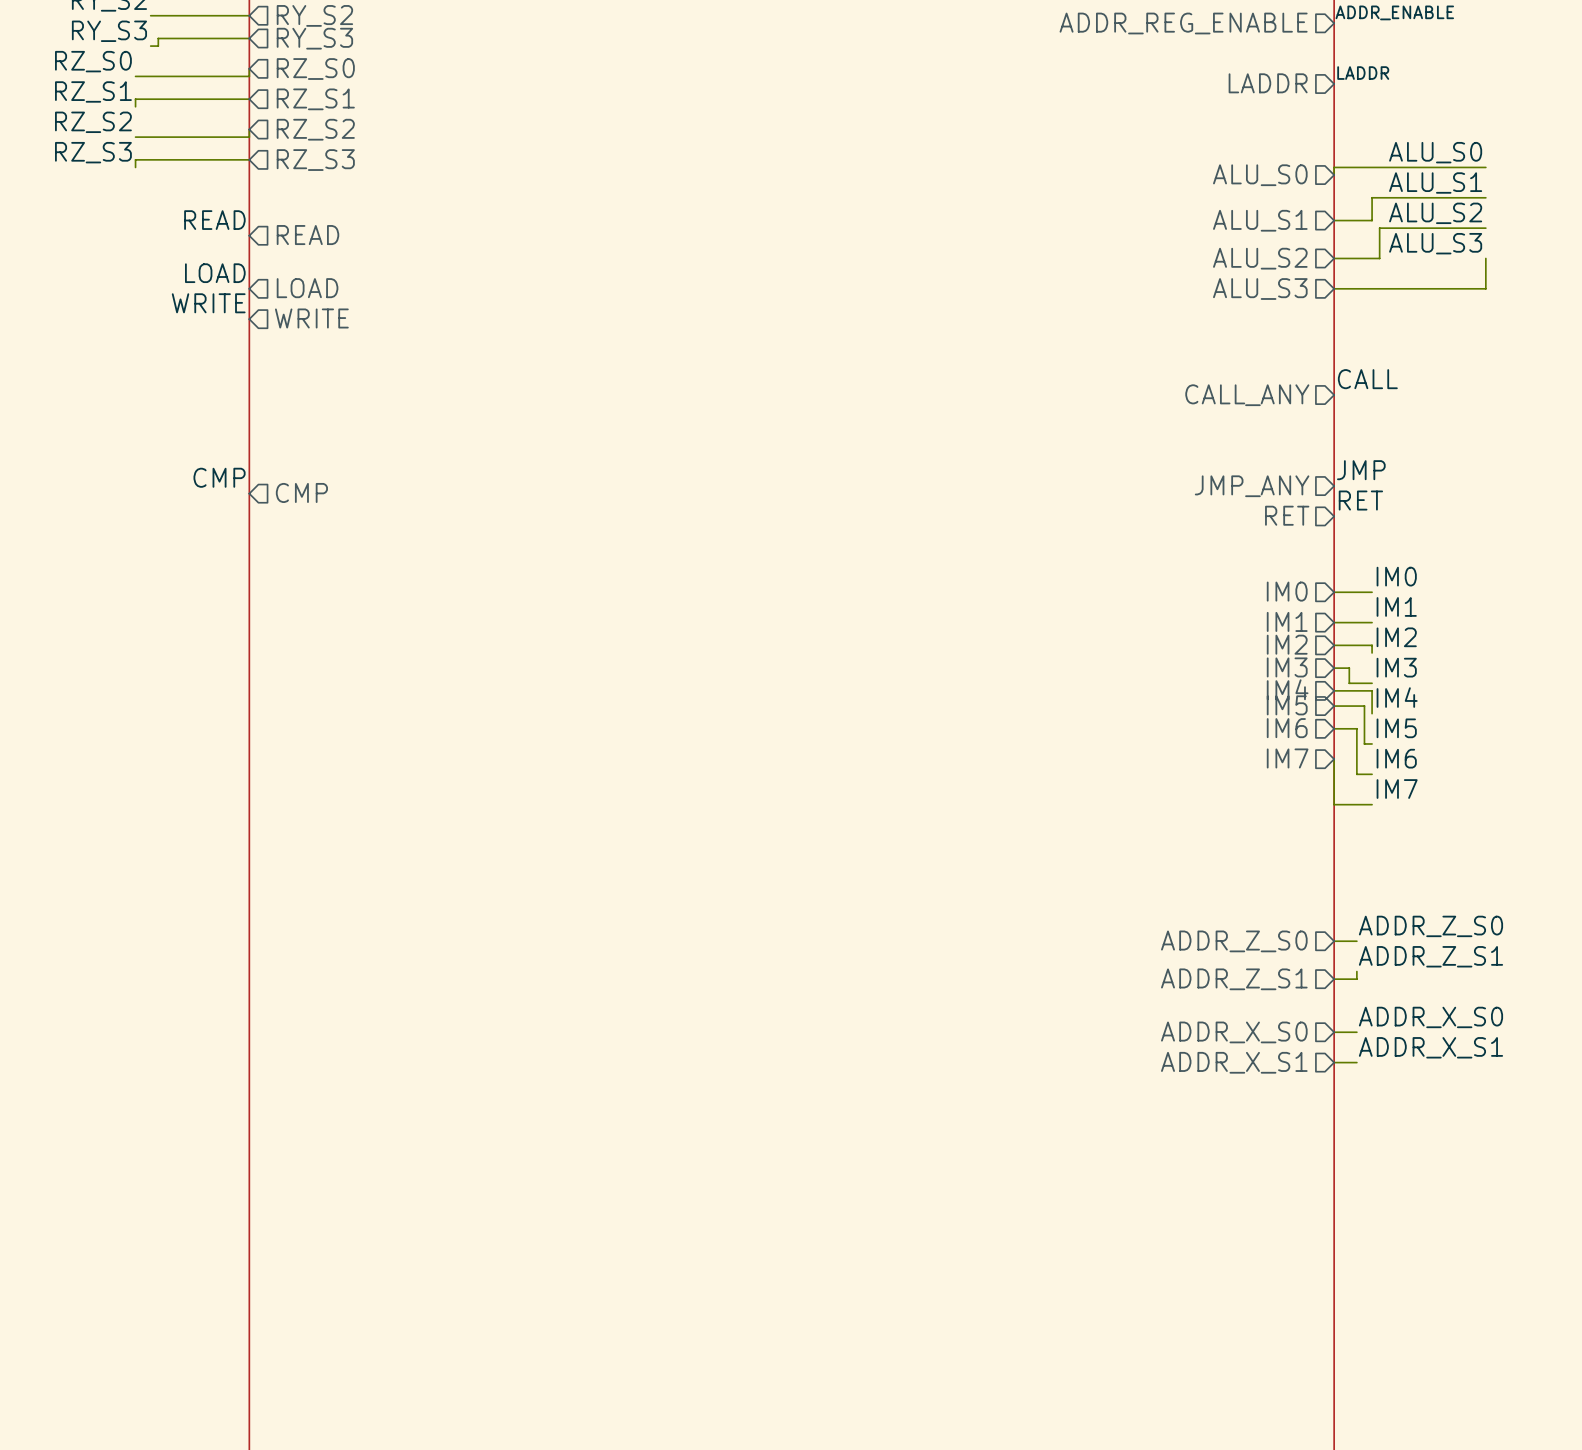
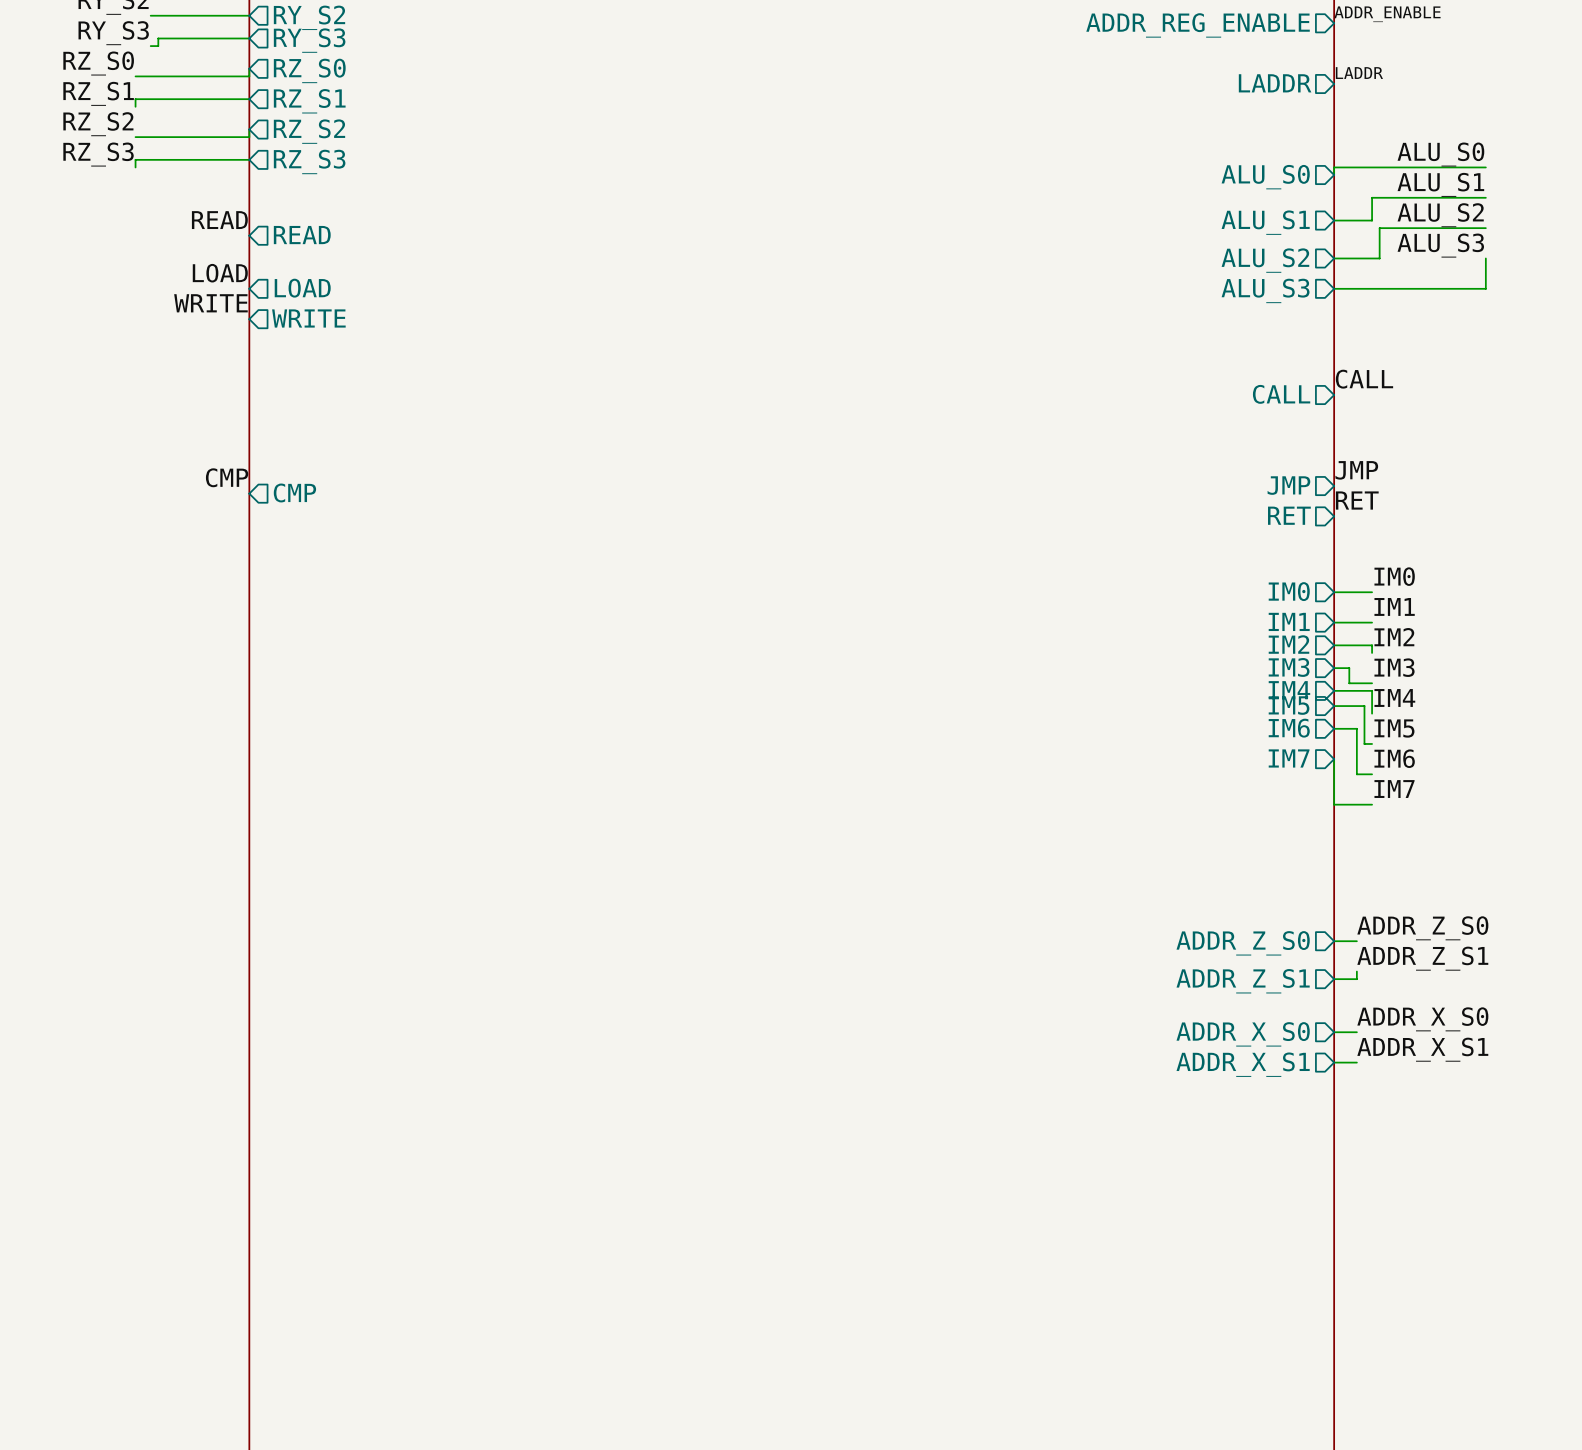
sheet pin: CALL_ANY (1247, 395) -> CALL (1281, 394)
sheet pin: JMP_ANY (1252, 486) -> JMP (1288, 485)

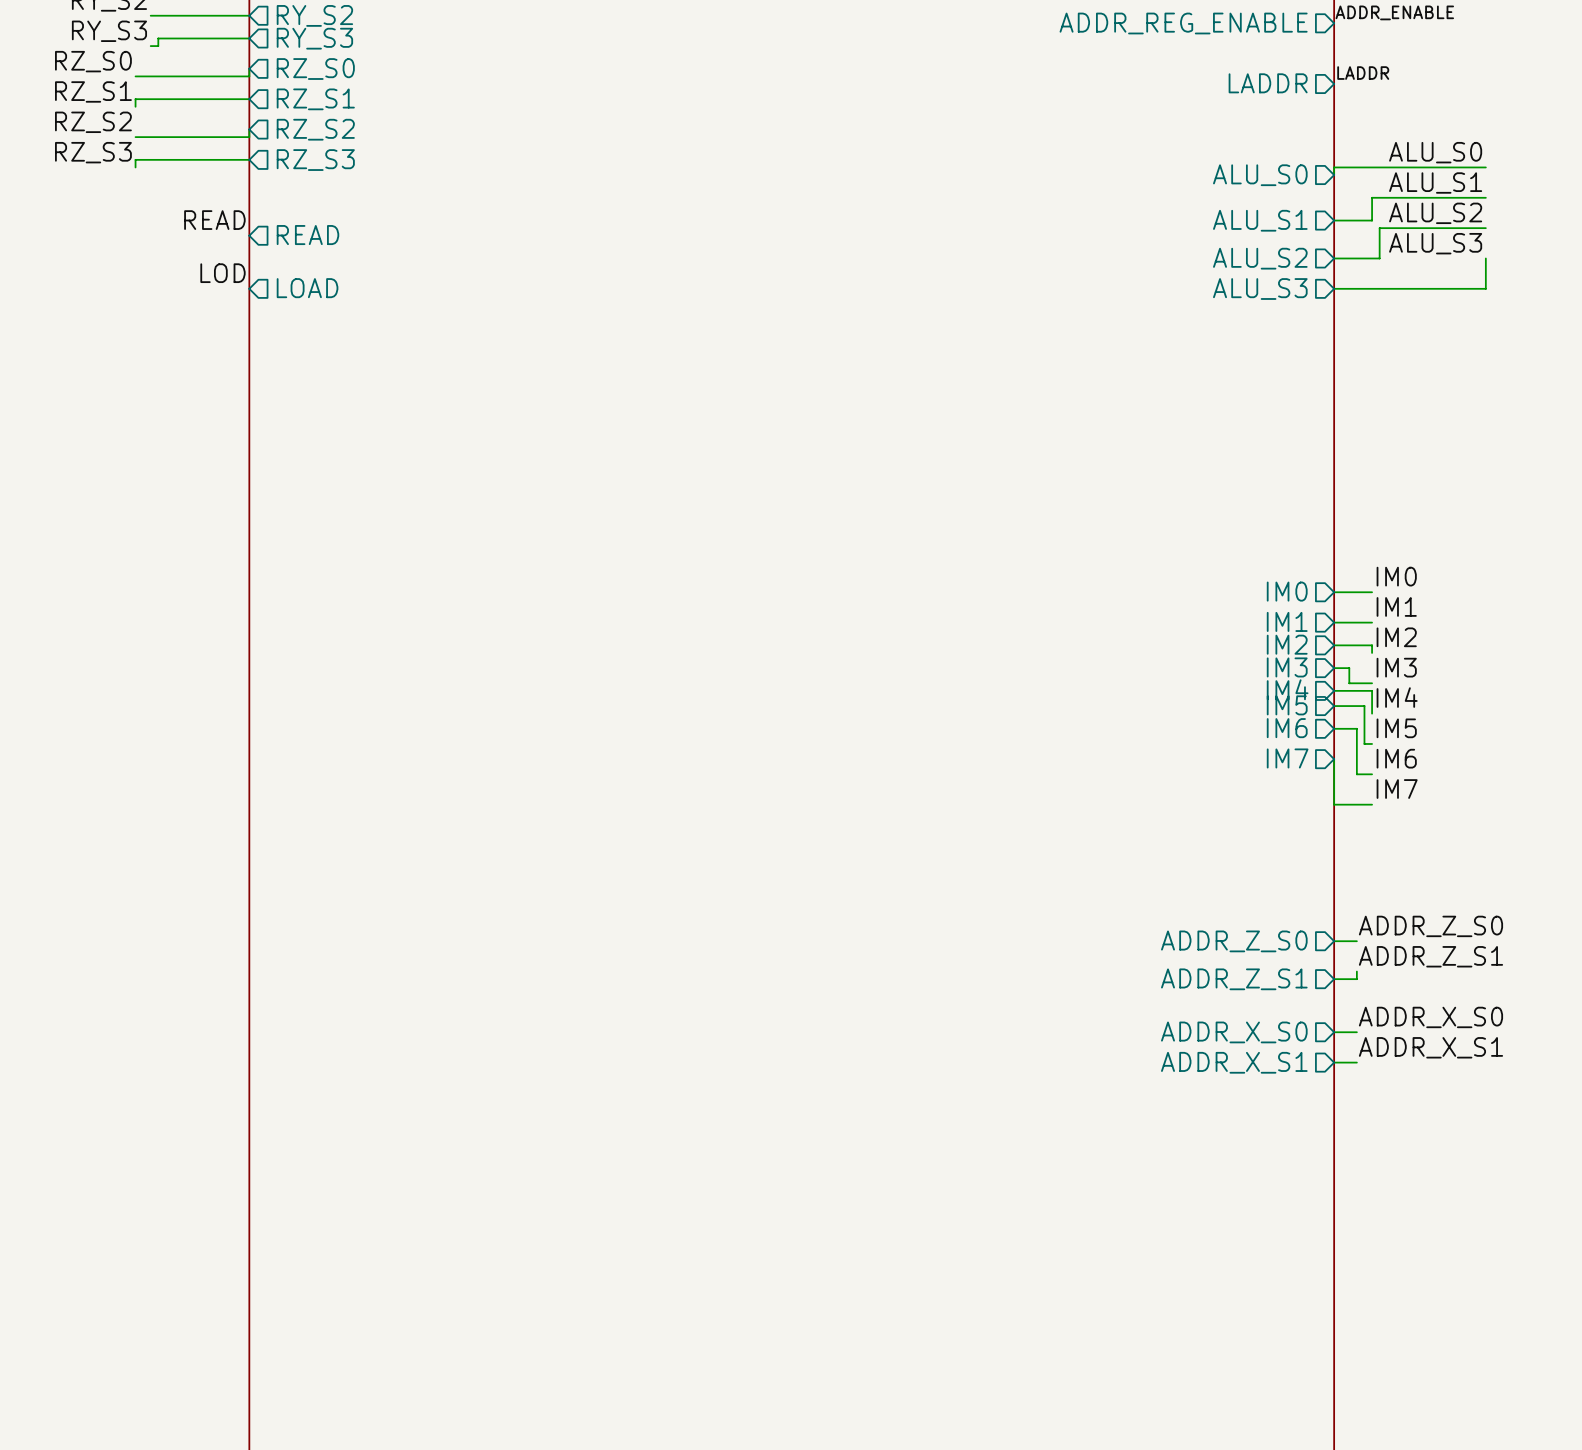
label: LOAD (220, 273) -> LOD (222, 273)
label: WRITE (210, 303) -> none
sheet pin: WRITE (308, 318) -> none
label: CALL (1364, 379) -> none
sheet pin: CALL (1281, 394) -> none
label: JMP (1356, 470) -> none
label: CMP (227, 477) -> none
sheet pin: JMP (1288, 485) -> none
sheet pin: CMP (294, 492) -> none
label: RET (1357, 500) -> none
sheet pin: RET (1289, 515) -> none

